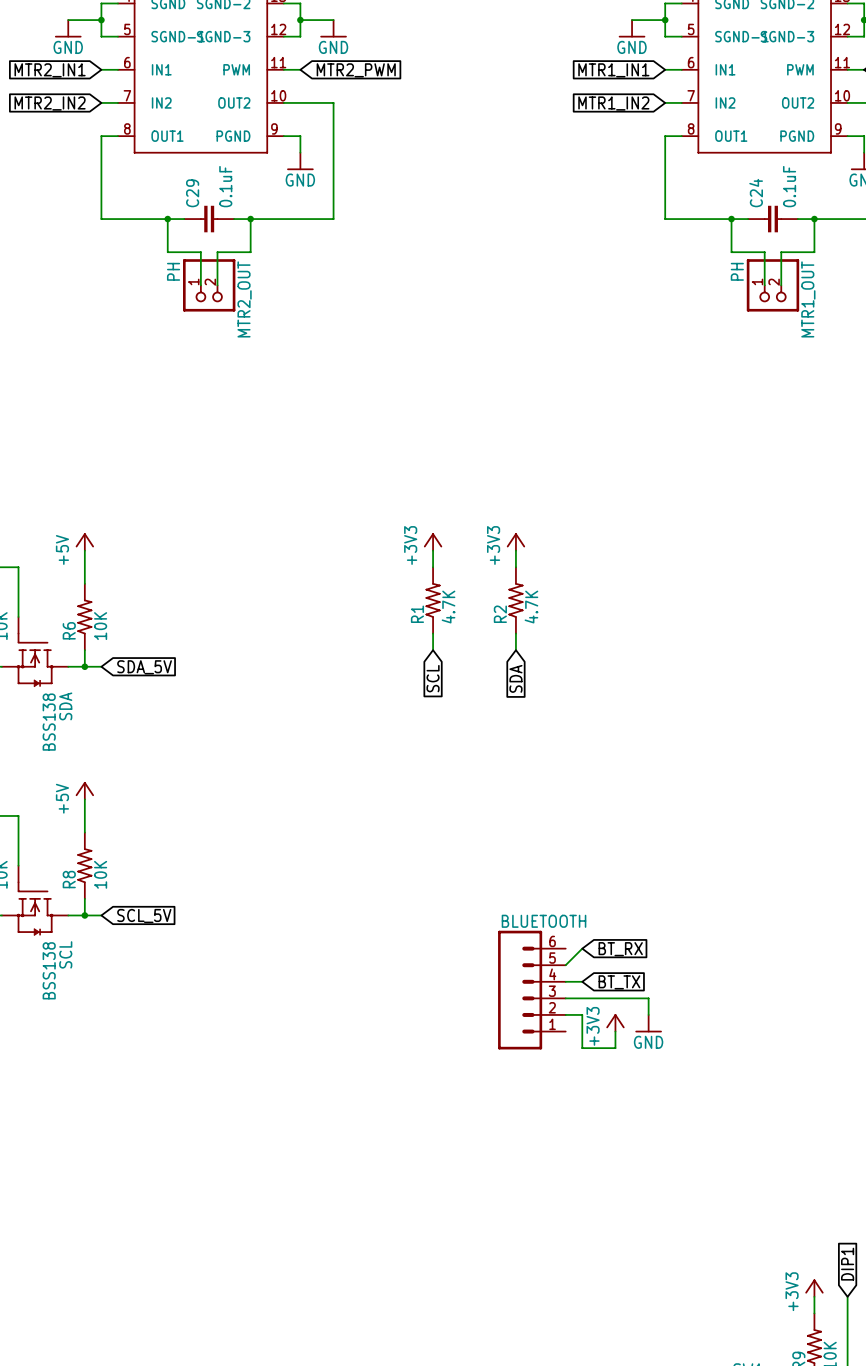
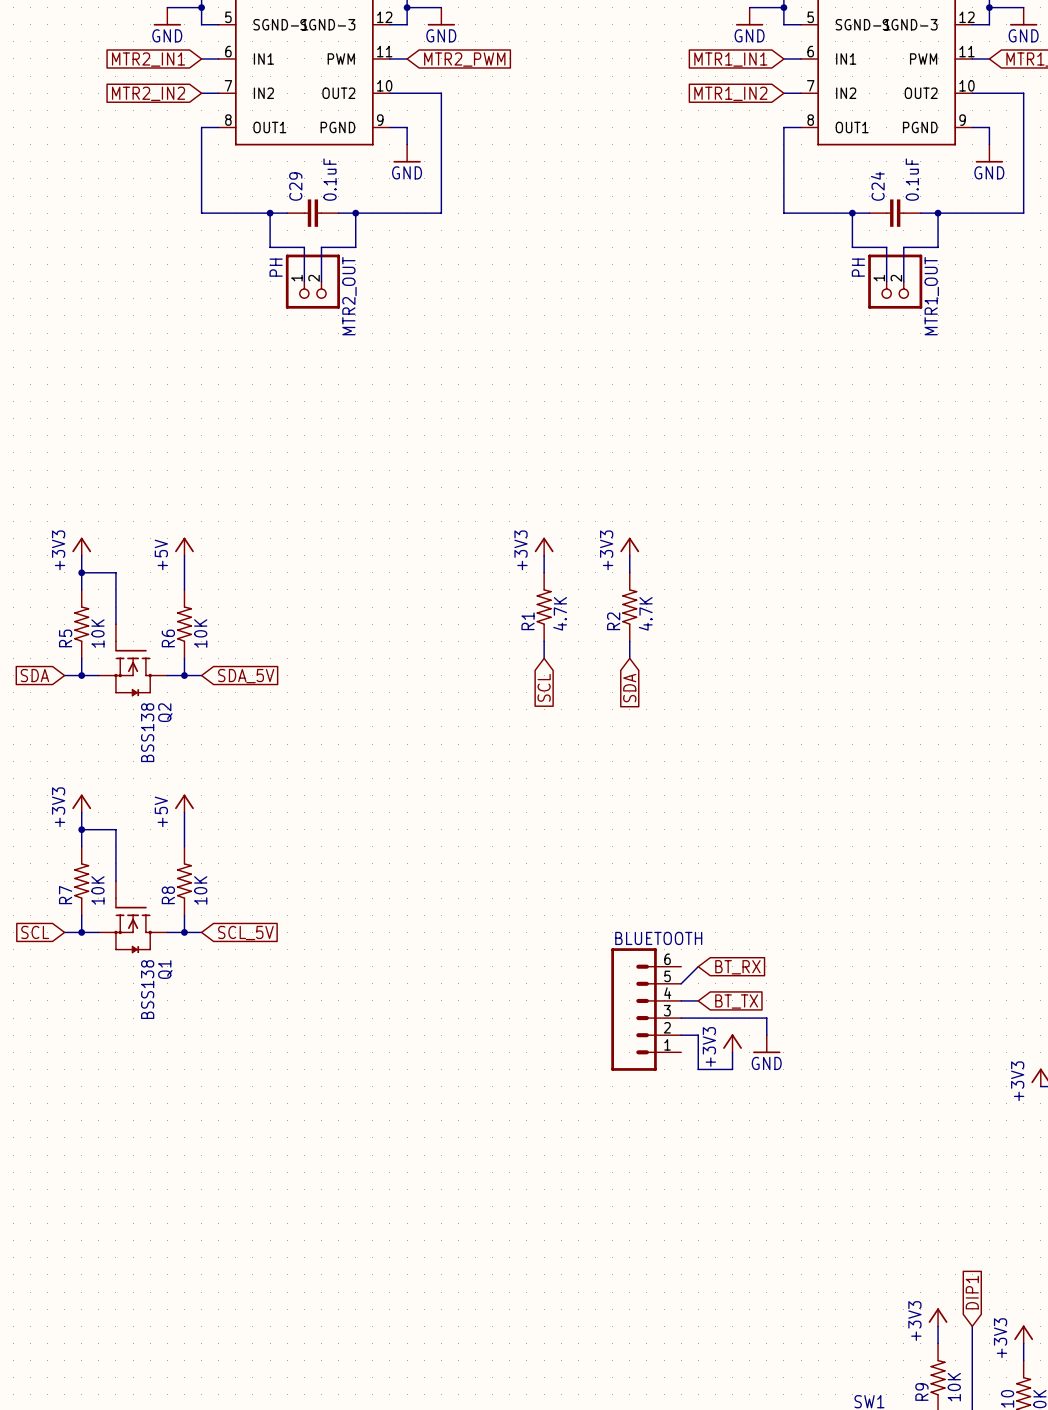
SDA name: SDA (65, 706) -> Q2 (165, 712)
SCL name: SCL (65, 954) -> Q1 (165, 969)

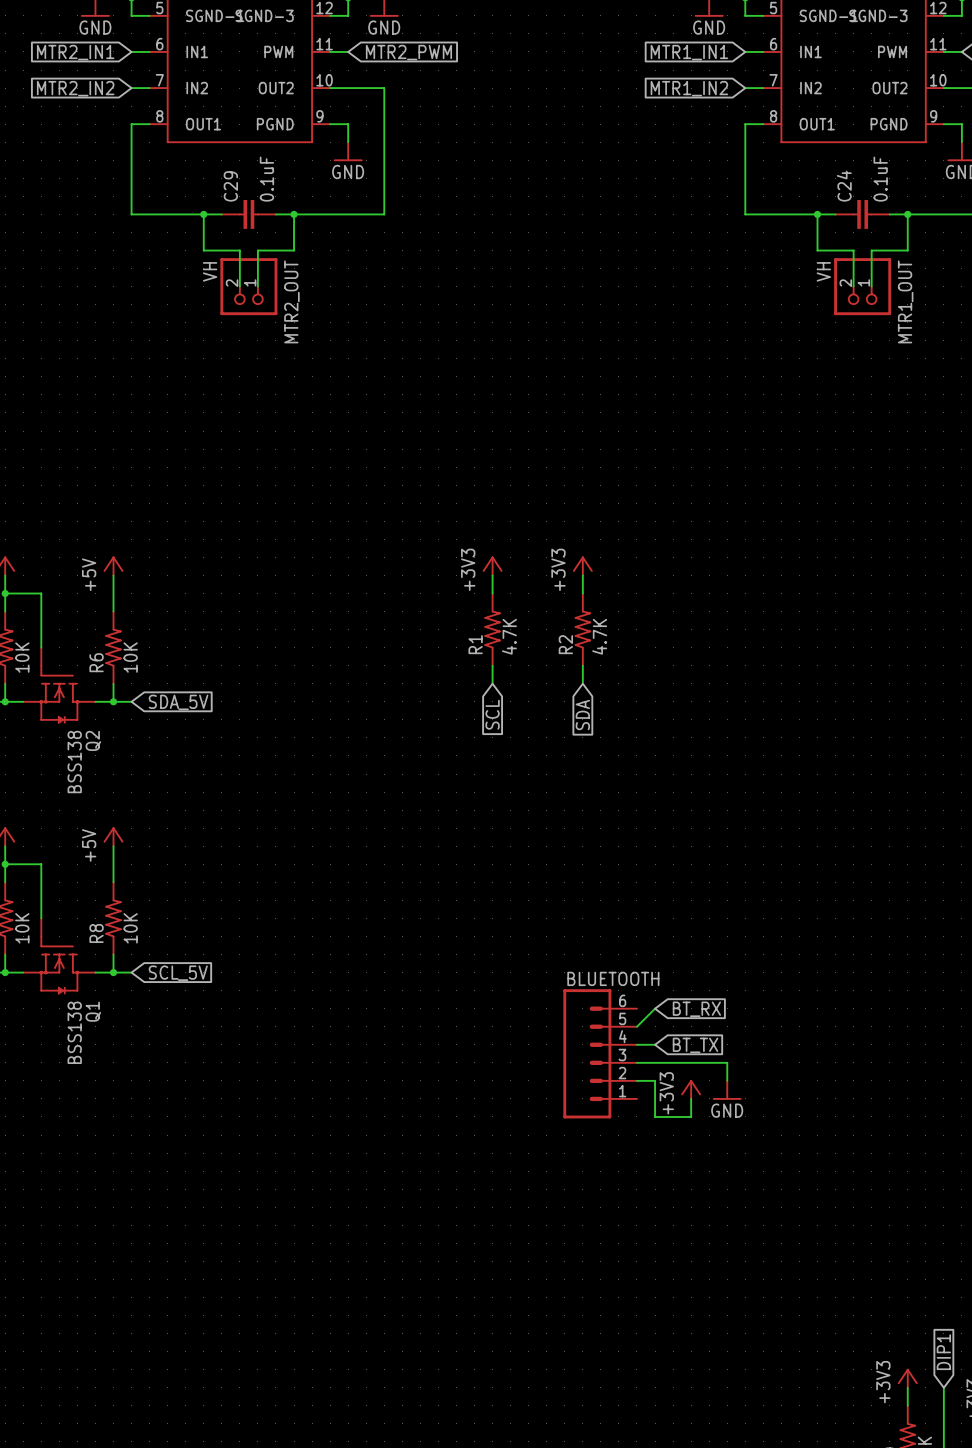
MTR2_OUT value: PH (276, 267) -> VH (210, 271)
MTR1_OUT value: PH (858, 267) -> VH (823, 271)
MTR2_OUT flip: as is (312, 281) -> left-right (248, 286)
MTR1_OUT flip: as is (895, 281) -> left-right (862, 286)

